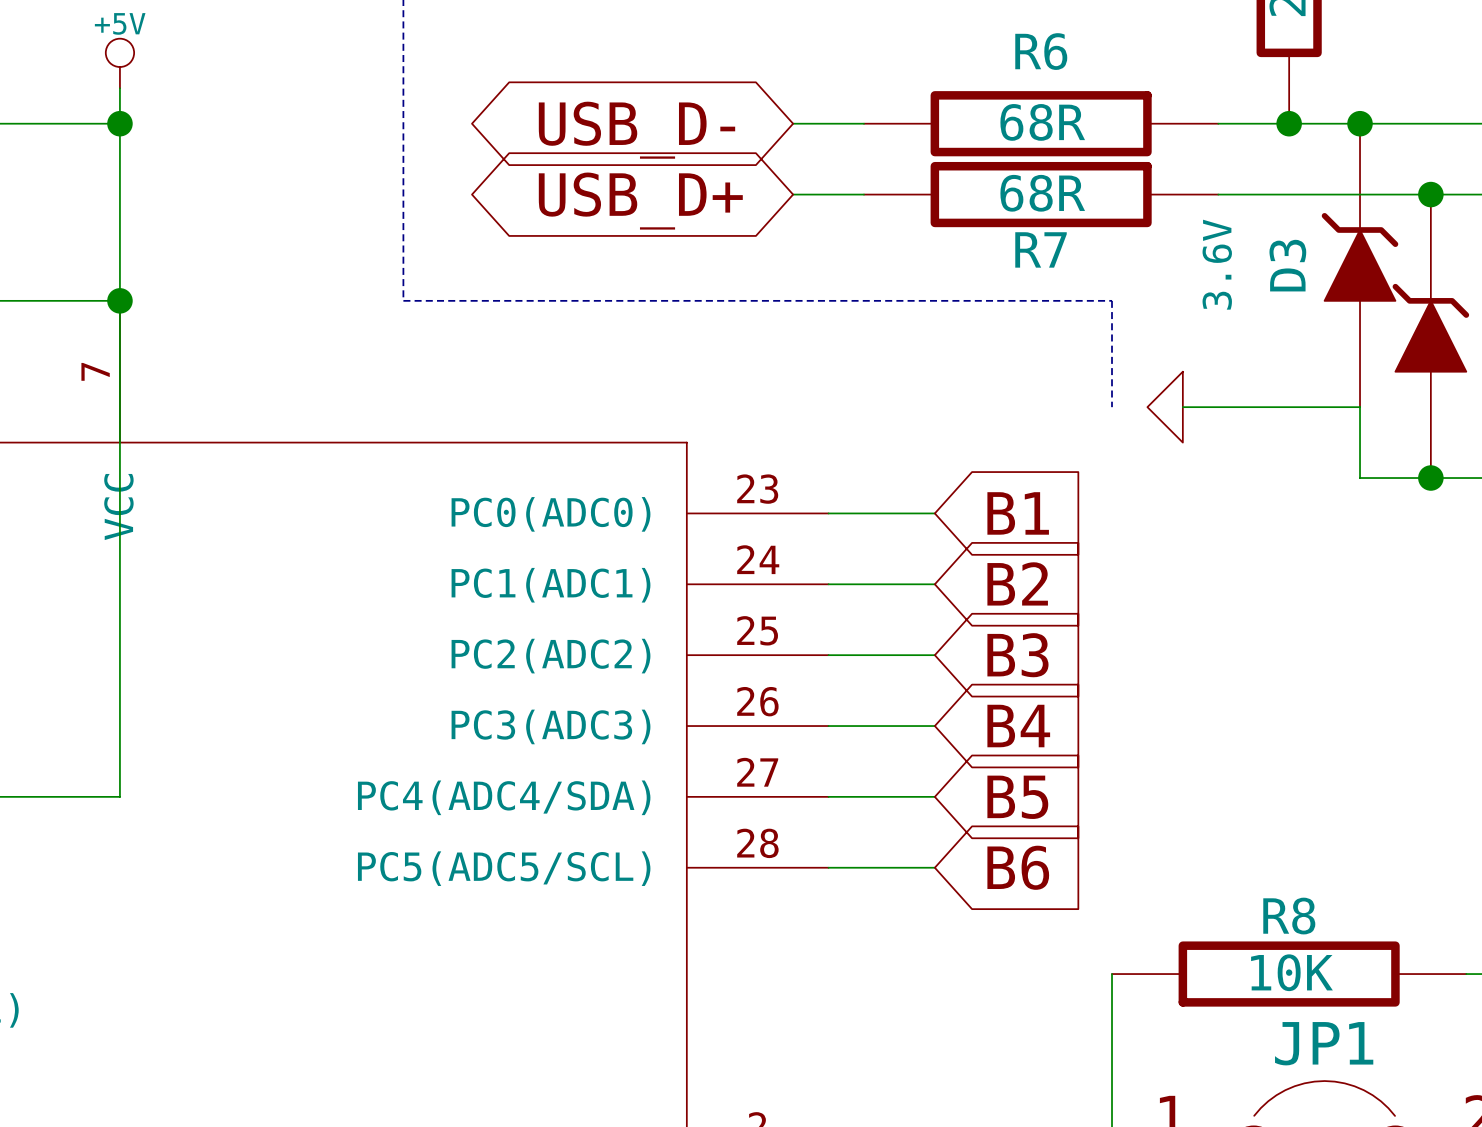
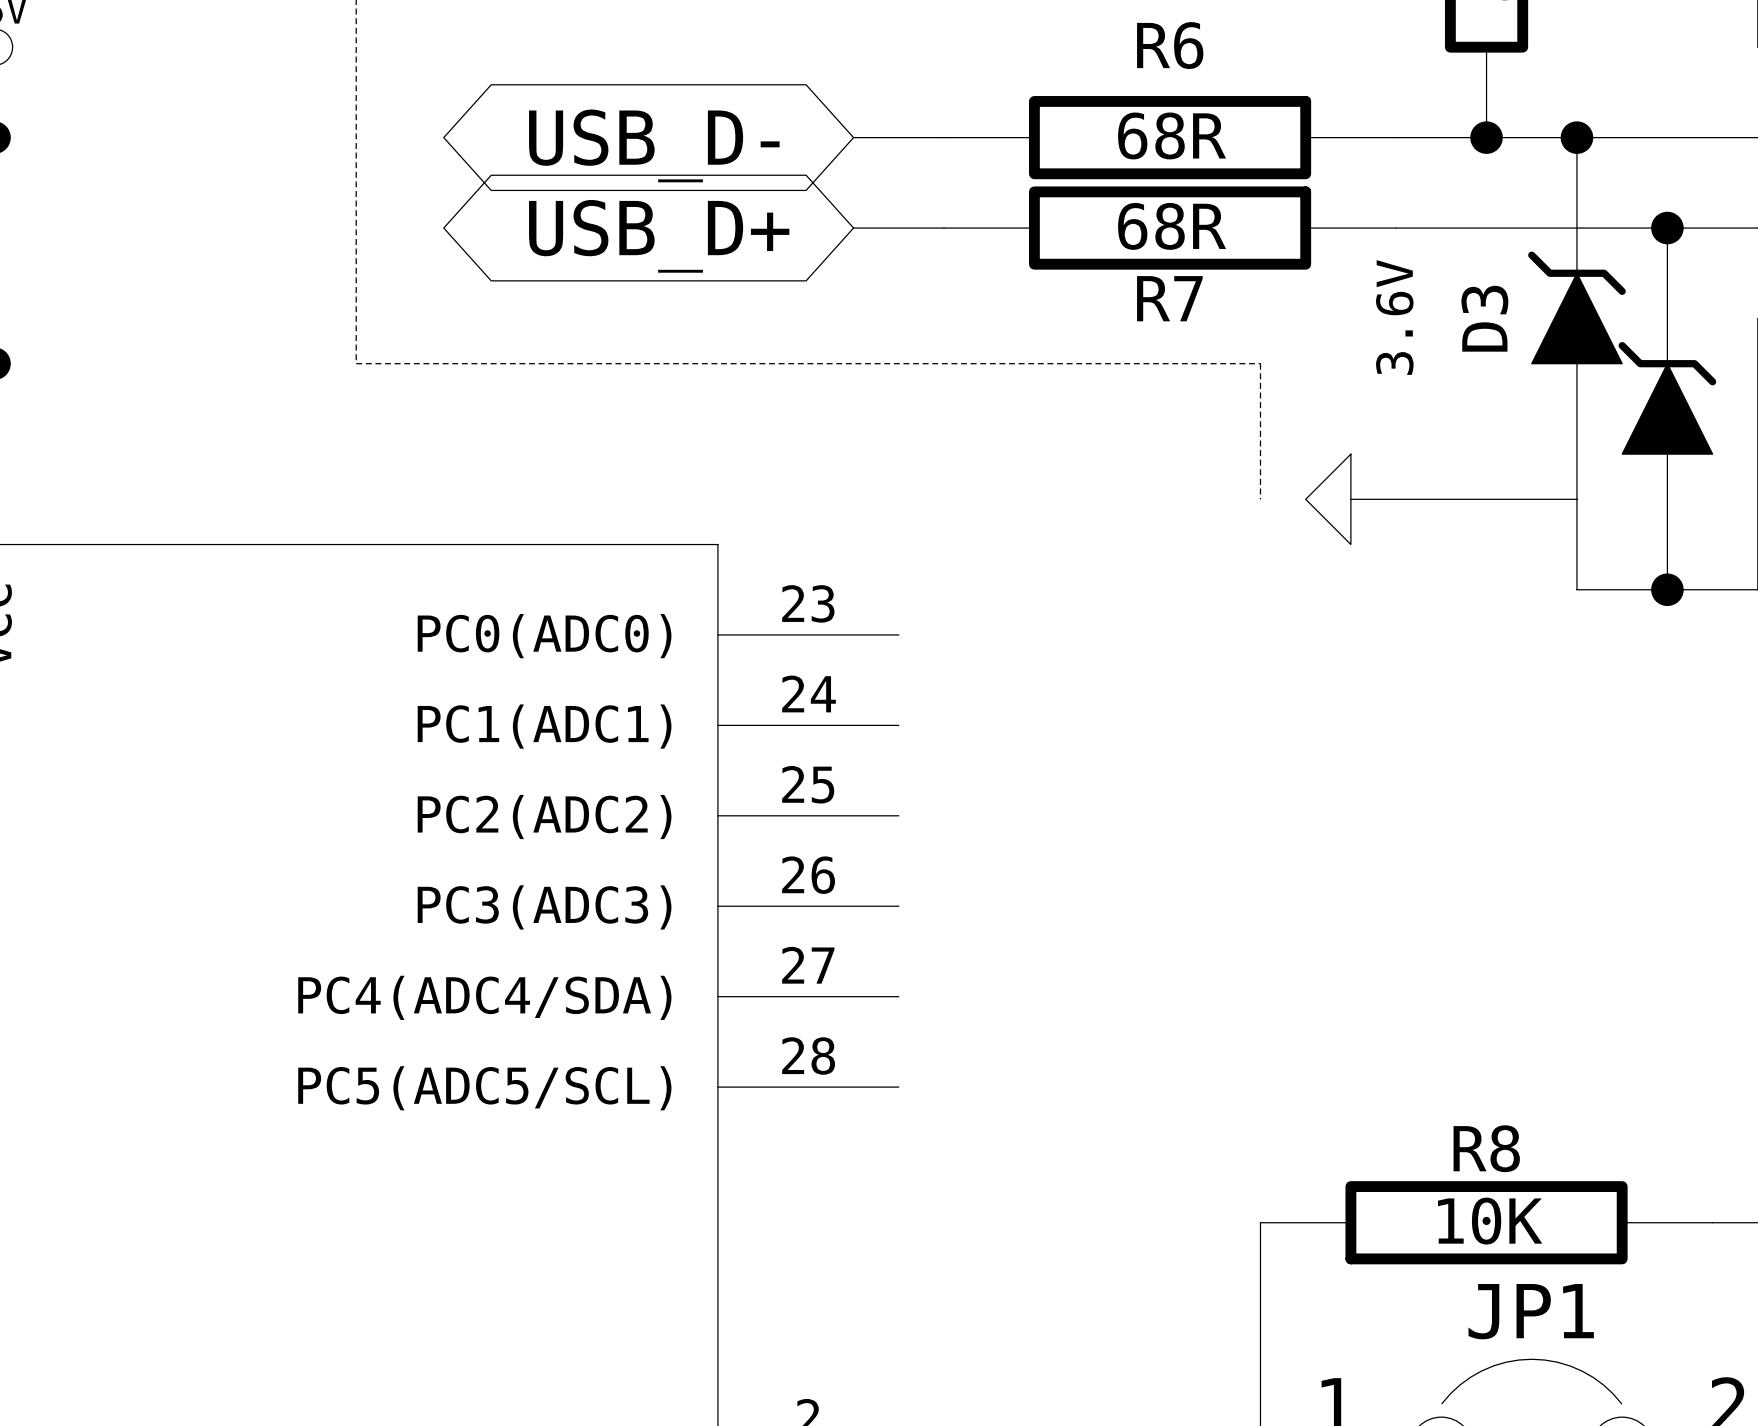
wire: (828, 513) (934, 513) -> none
global label: B1 (1018, 513) -> none
global label: B2 (1017, 583) -> none
wire: (828, 584) (934, 584) -> none
wire: (828, 655) (934, 655) -> none
global label: B3 (1017, 655) -> none
wire: (828, 726) (934, 726) -> none
global label: B4 (1018, 726) -> none
wire: (828, 796) (934, 796) -> none
global label: B5 (1017, 797) -> none
wire: (828, 867) (934, 867) -> none
global label: B6 (1018, 867) -> none

